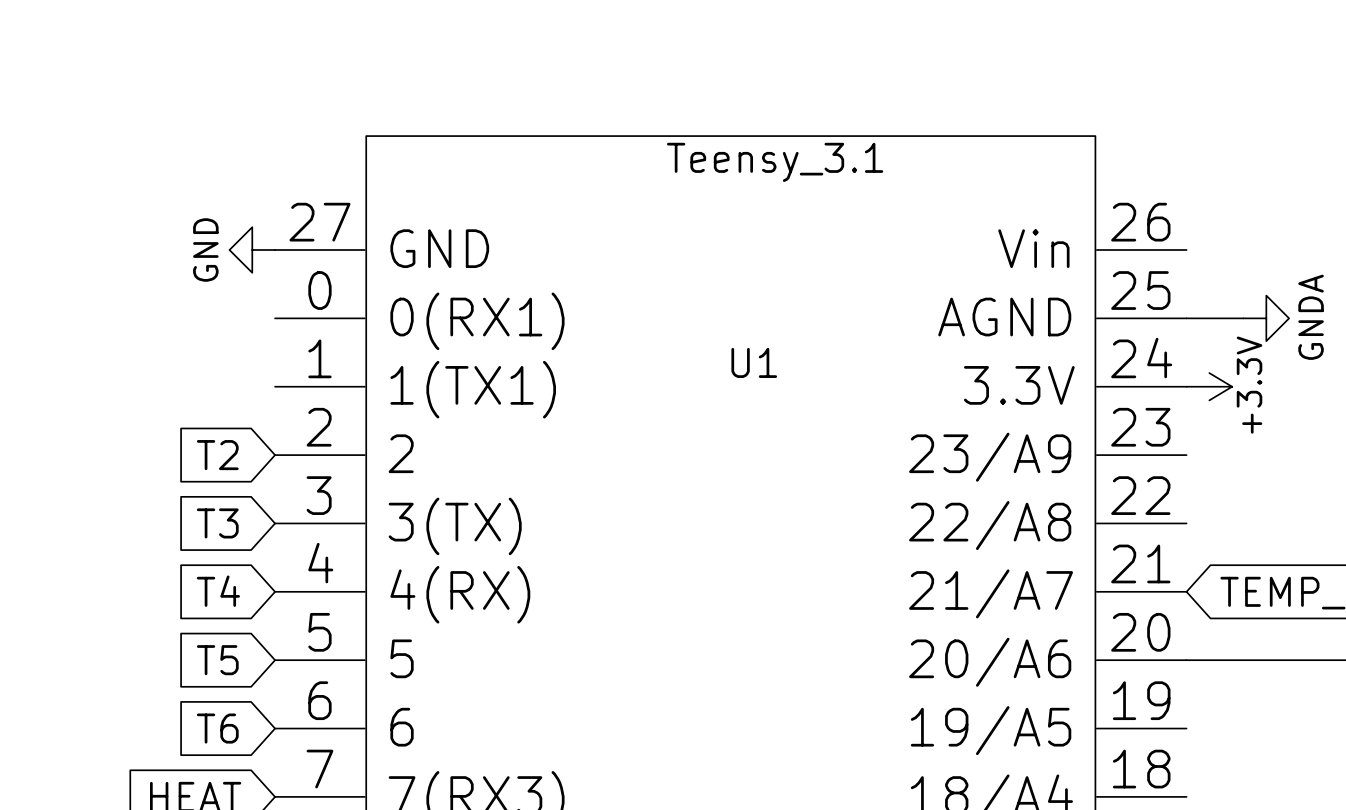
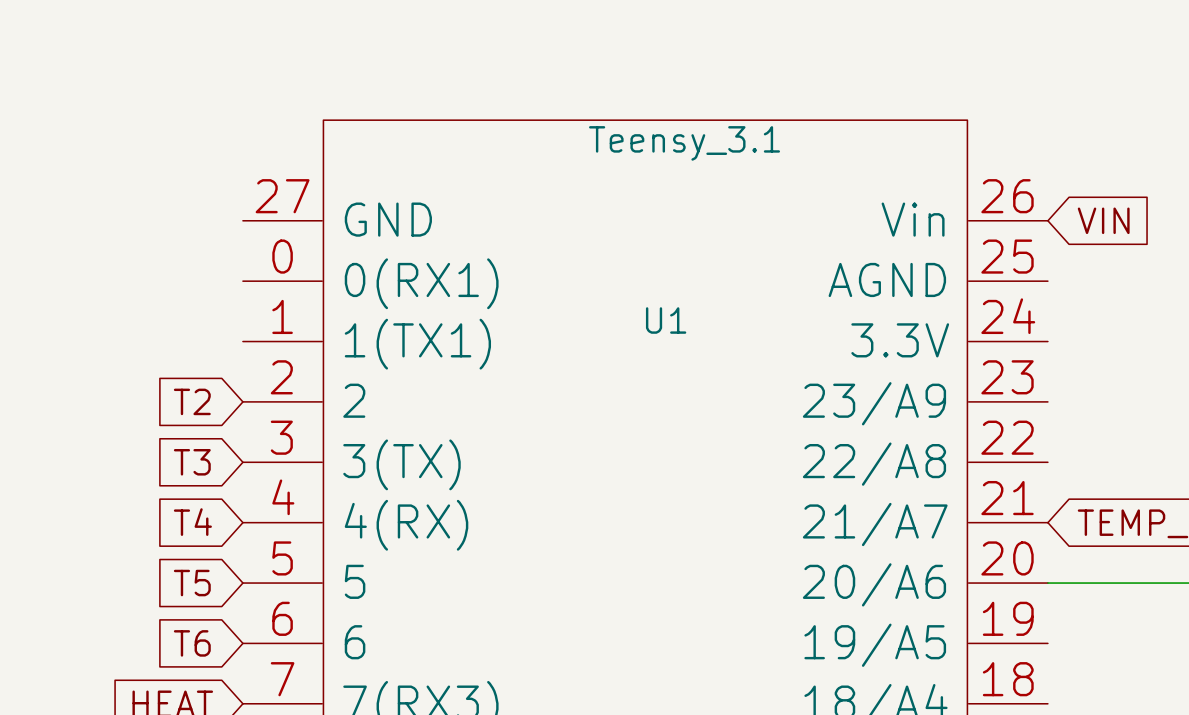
power symbol: GND (252, 250) -> none
global label: none -> VIN (1103, 220)
wire: (1186, 318) (1243, 318) -> none
power symbol: GNDA (1266, 318) -> none
power symbol: +3.3V (1209, 386) -> none

